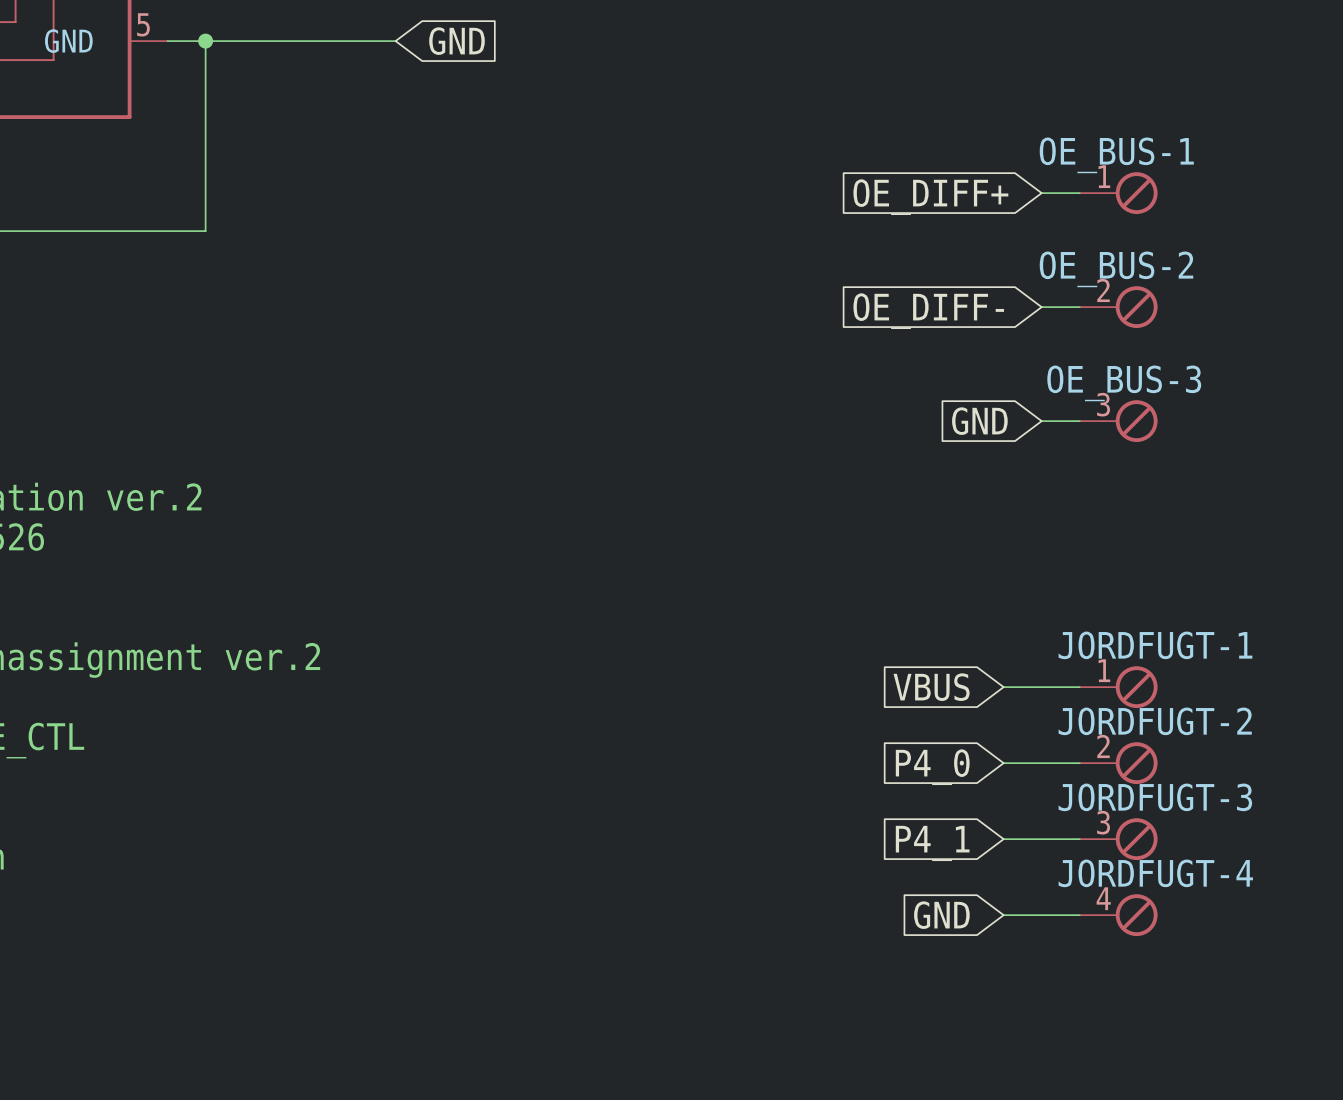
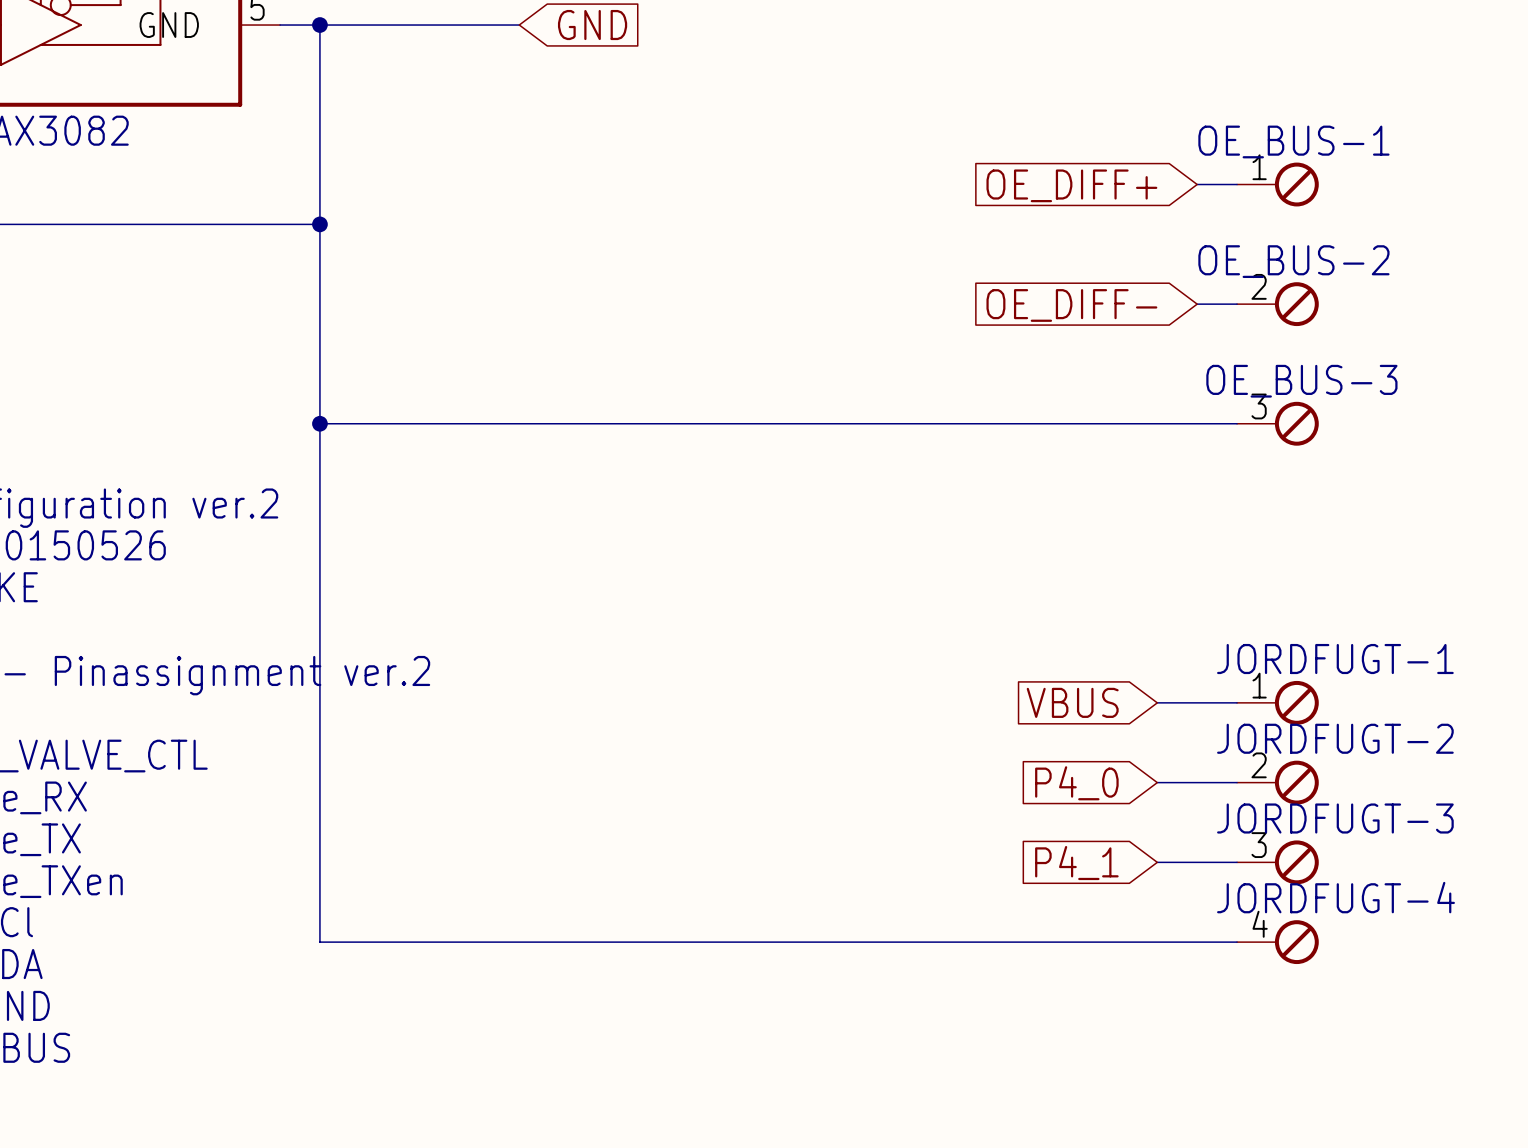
wire: none -> (319, 224) (319, 942) (1157, 942)
junction: none -> (319, 224)
wire: none -> (319, 423) (1197, 423)
junction: none -> (319, 423)
global label: GND (979, 421) -> none
global label: GND (941, 915) -> none

